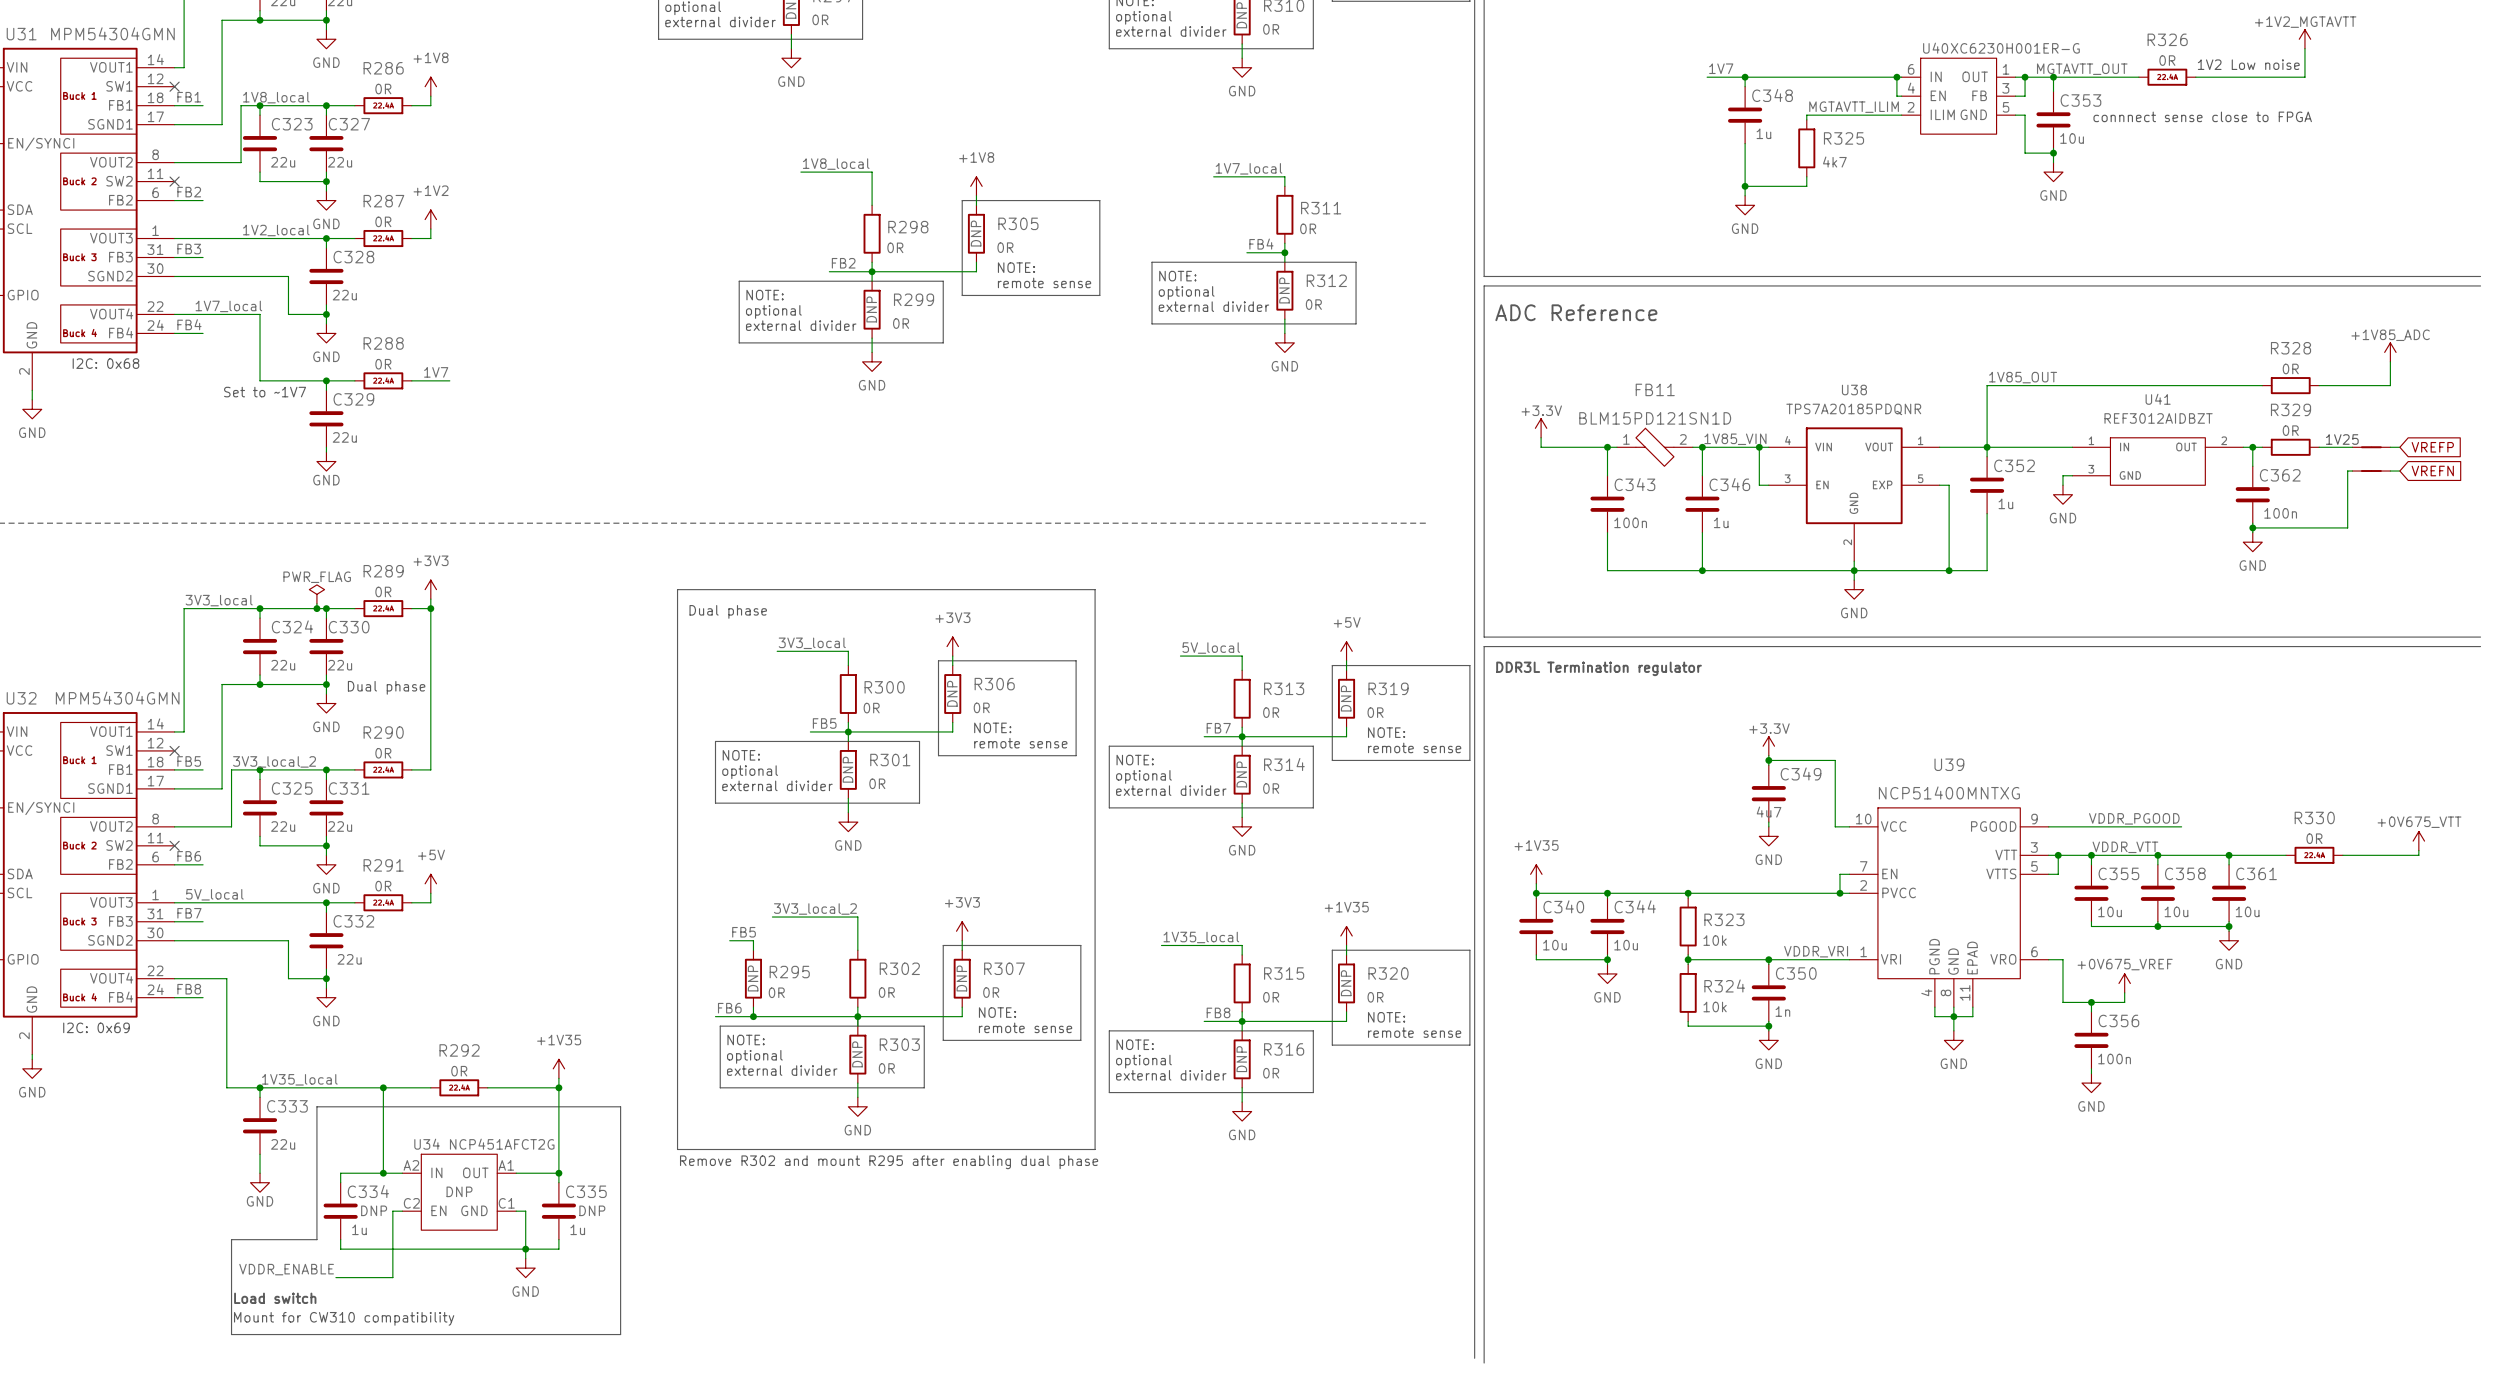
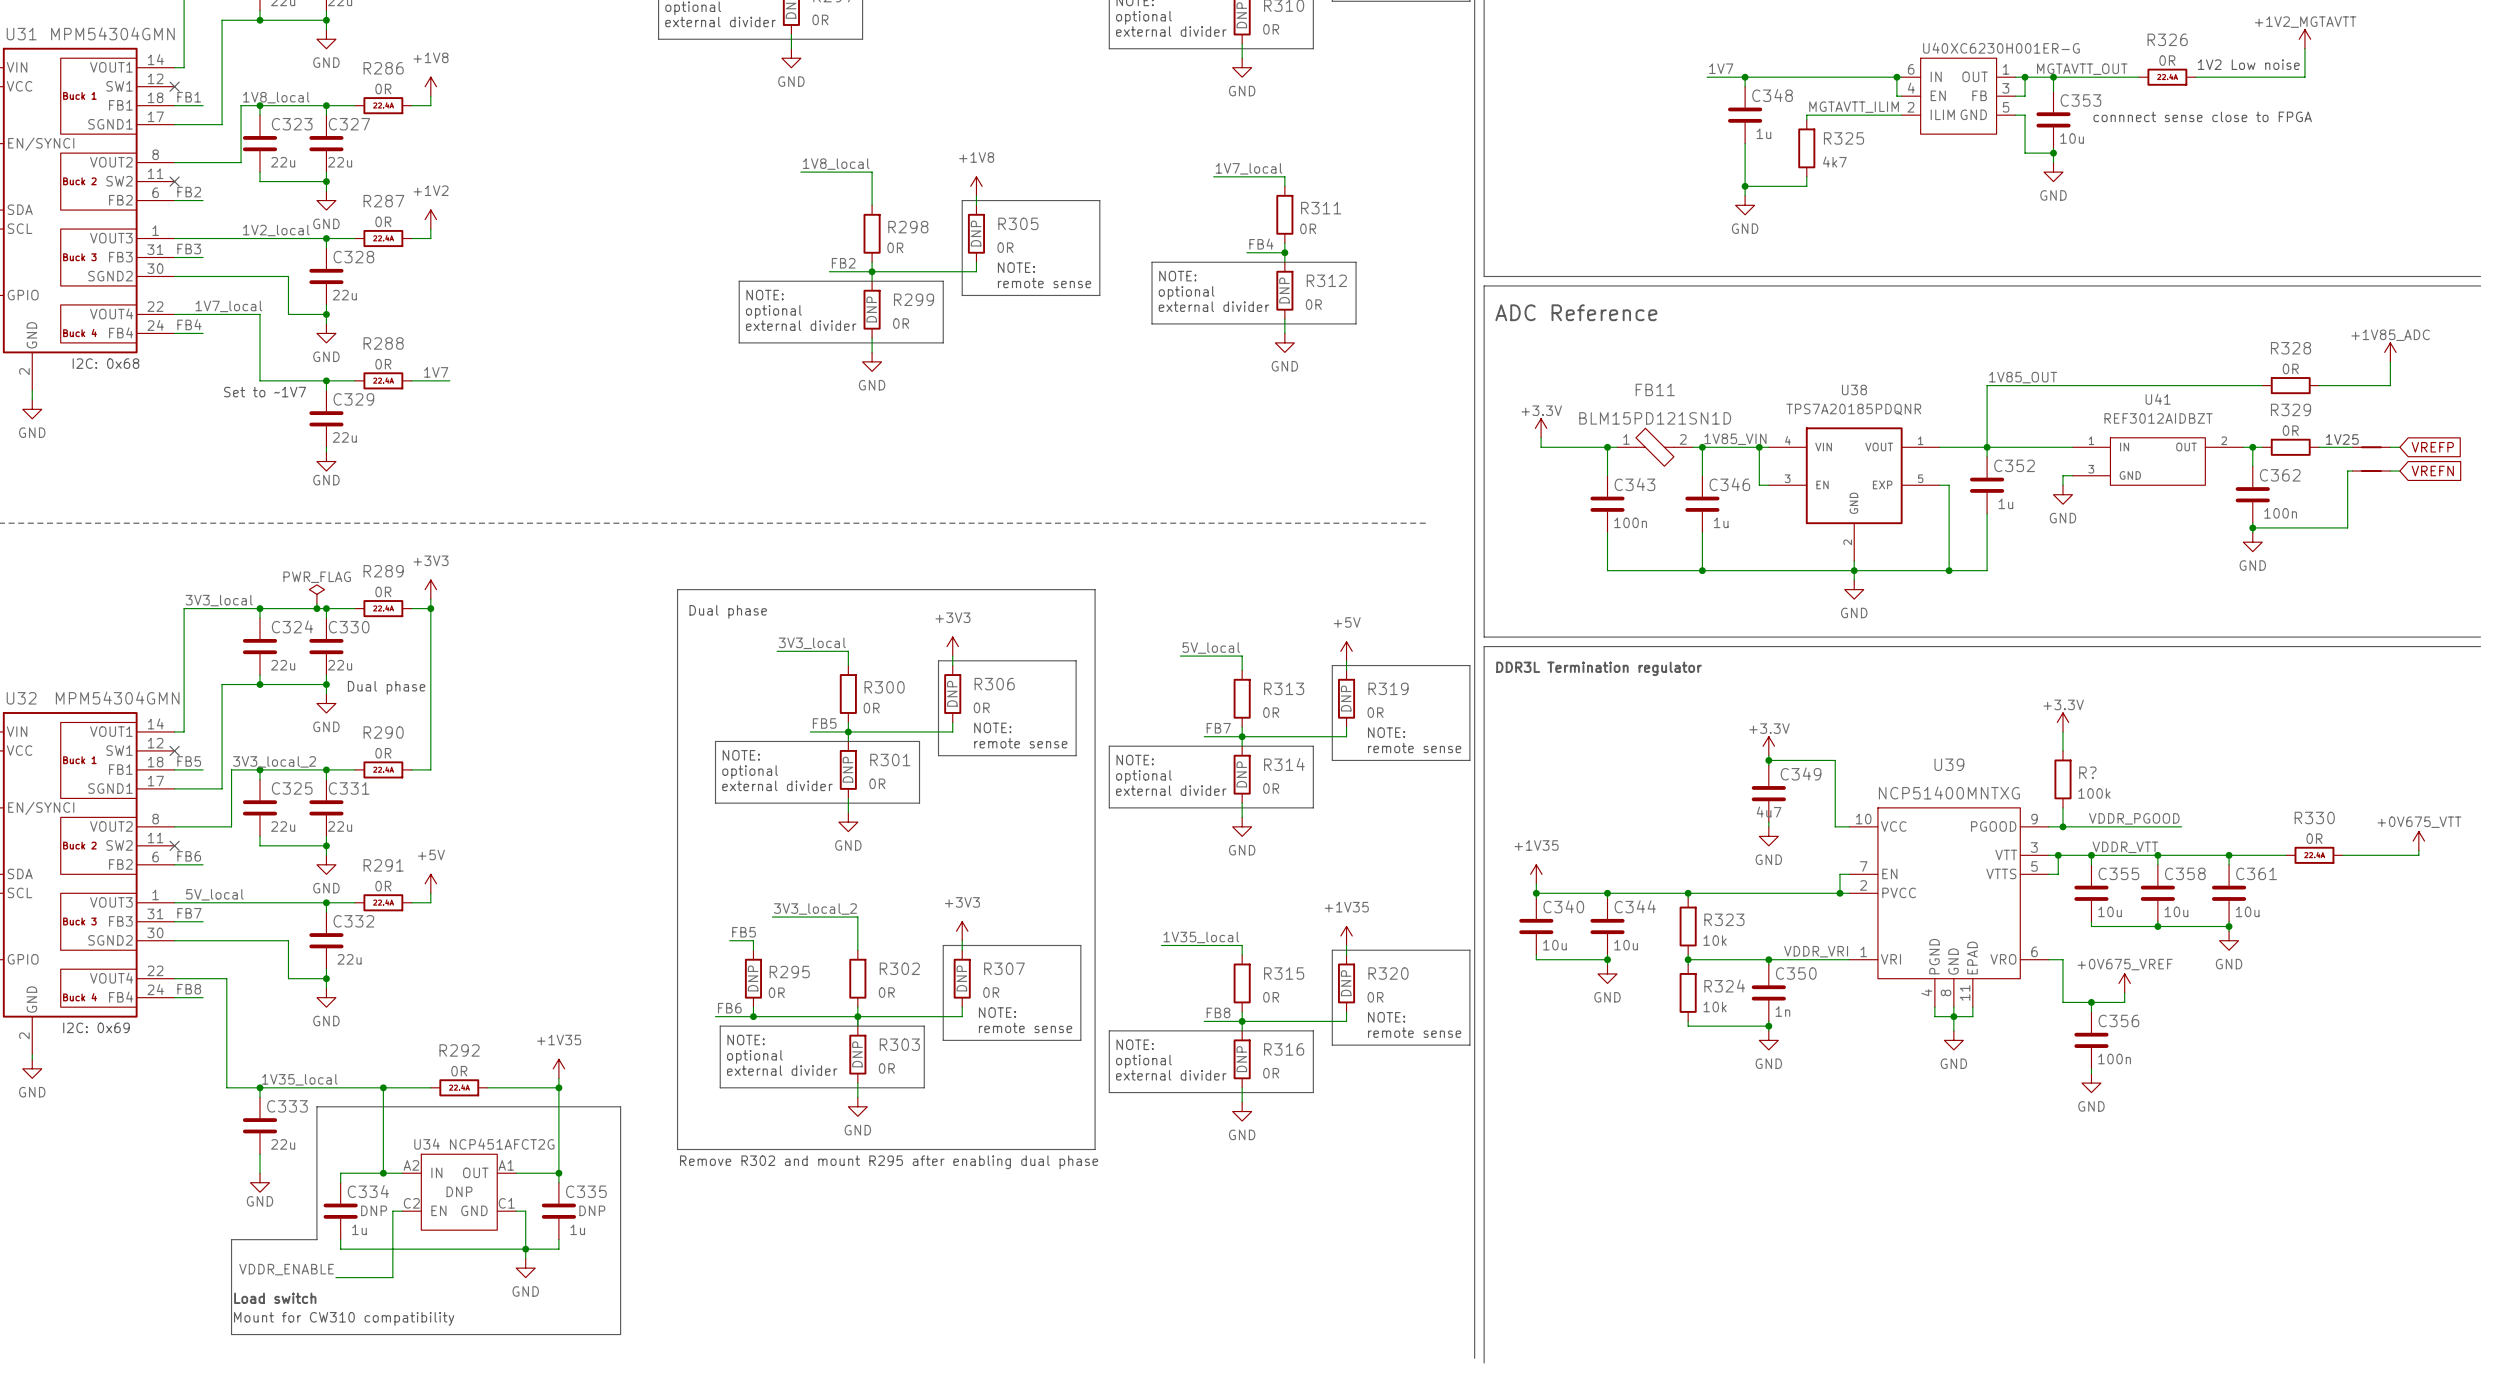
power symbol: none -> +3.3V (2062, 722)
wire: none -> (2062, 731) (2062, 750)
R?: none -> (2062, 779)
wire: none -> (2062, 807) (2062, 826)
junction: none -> (2062, 826)

